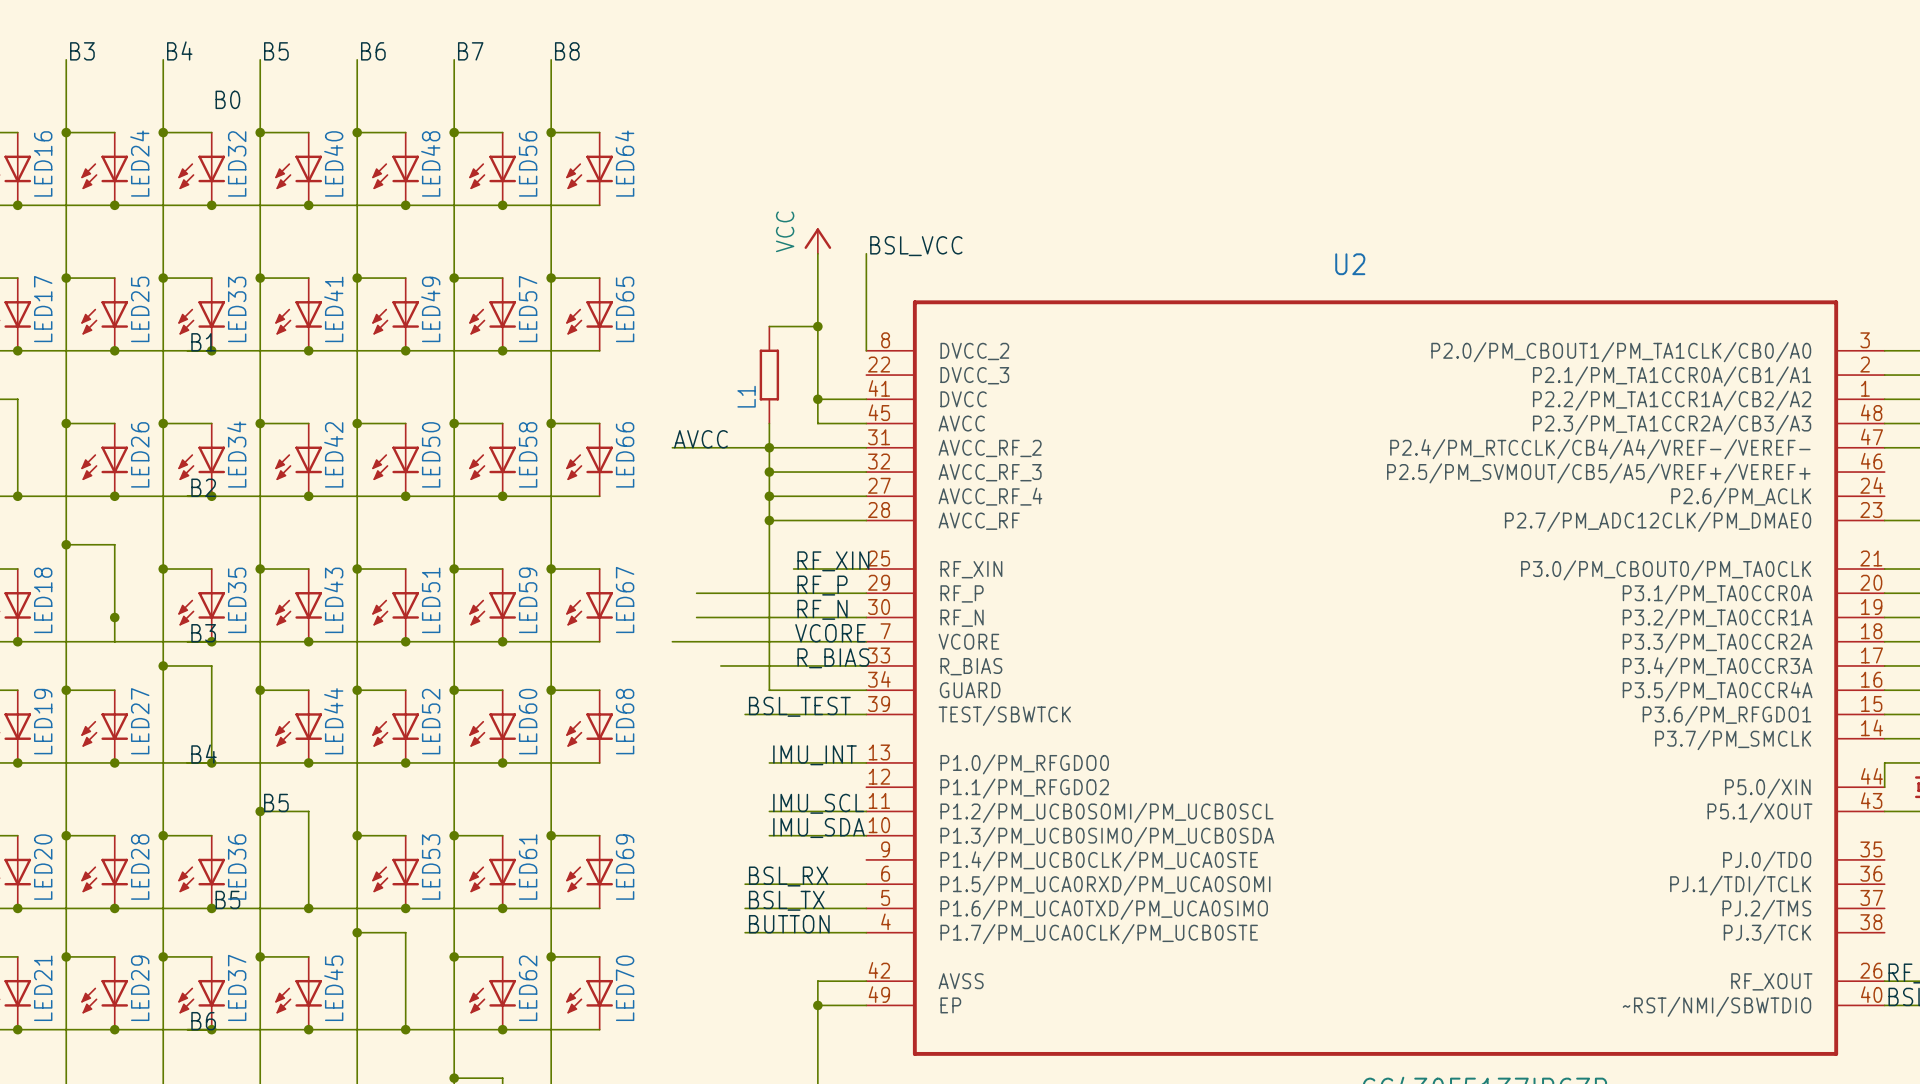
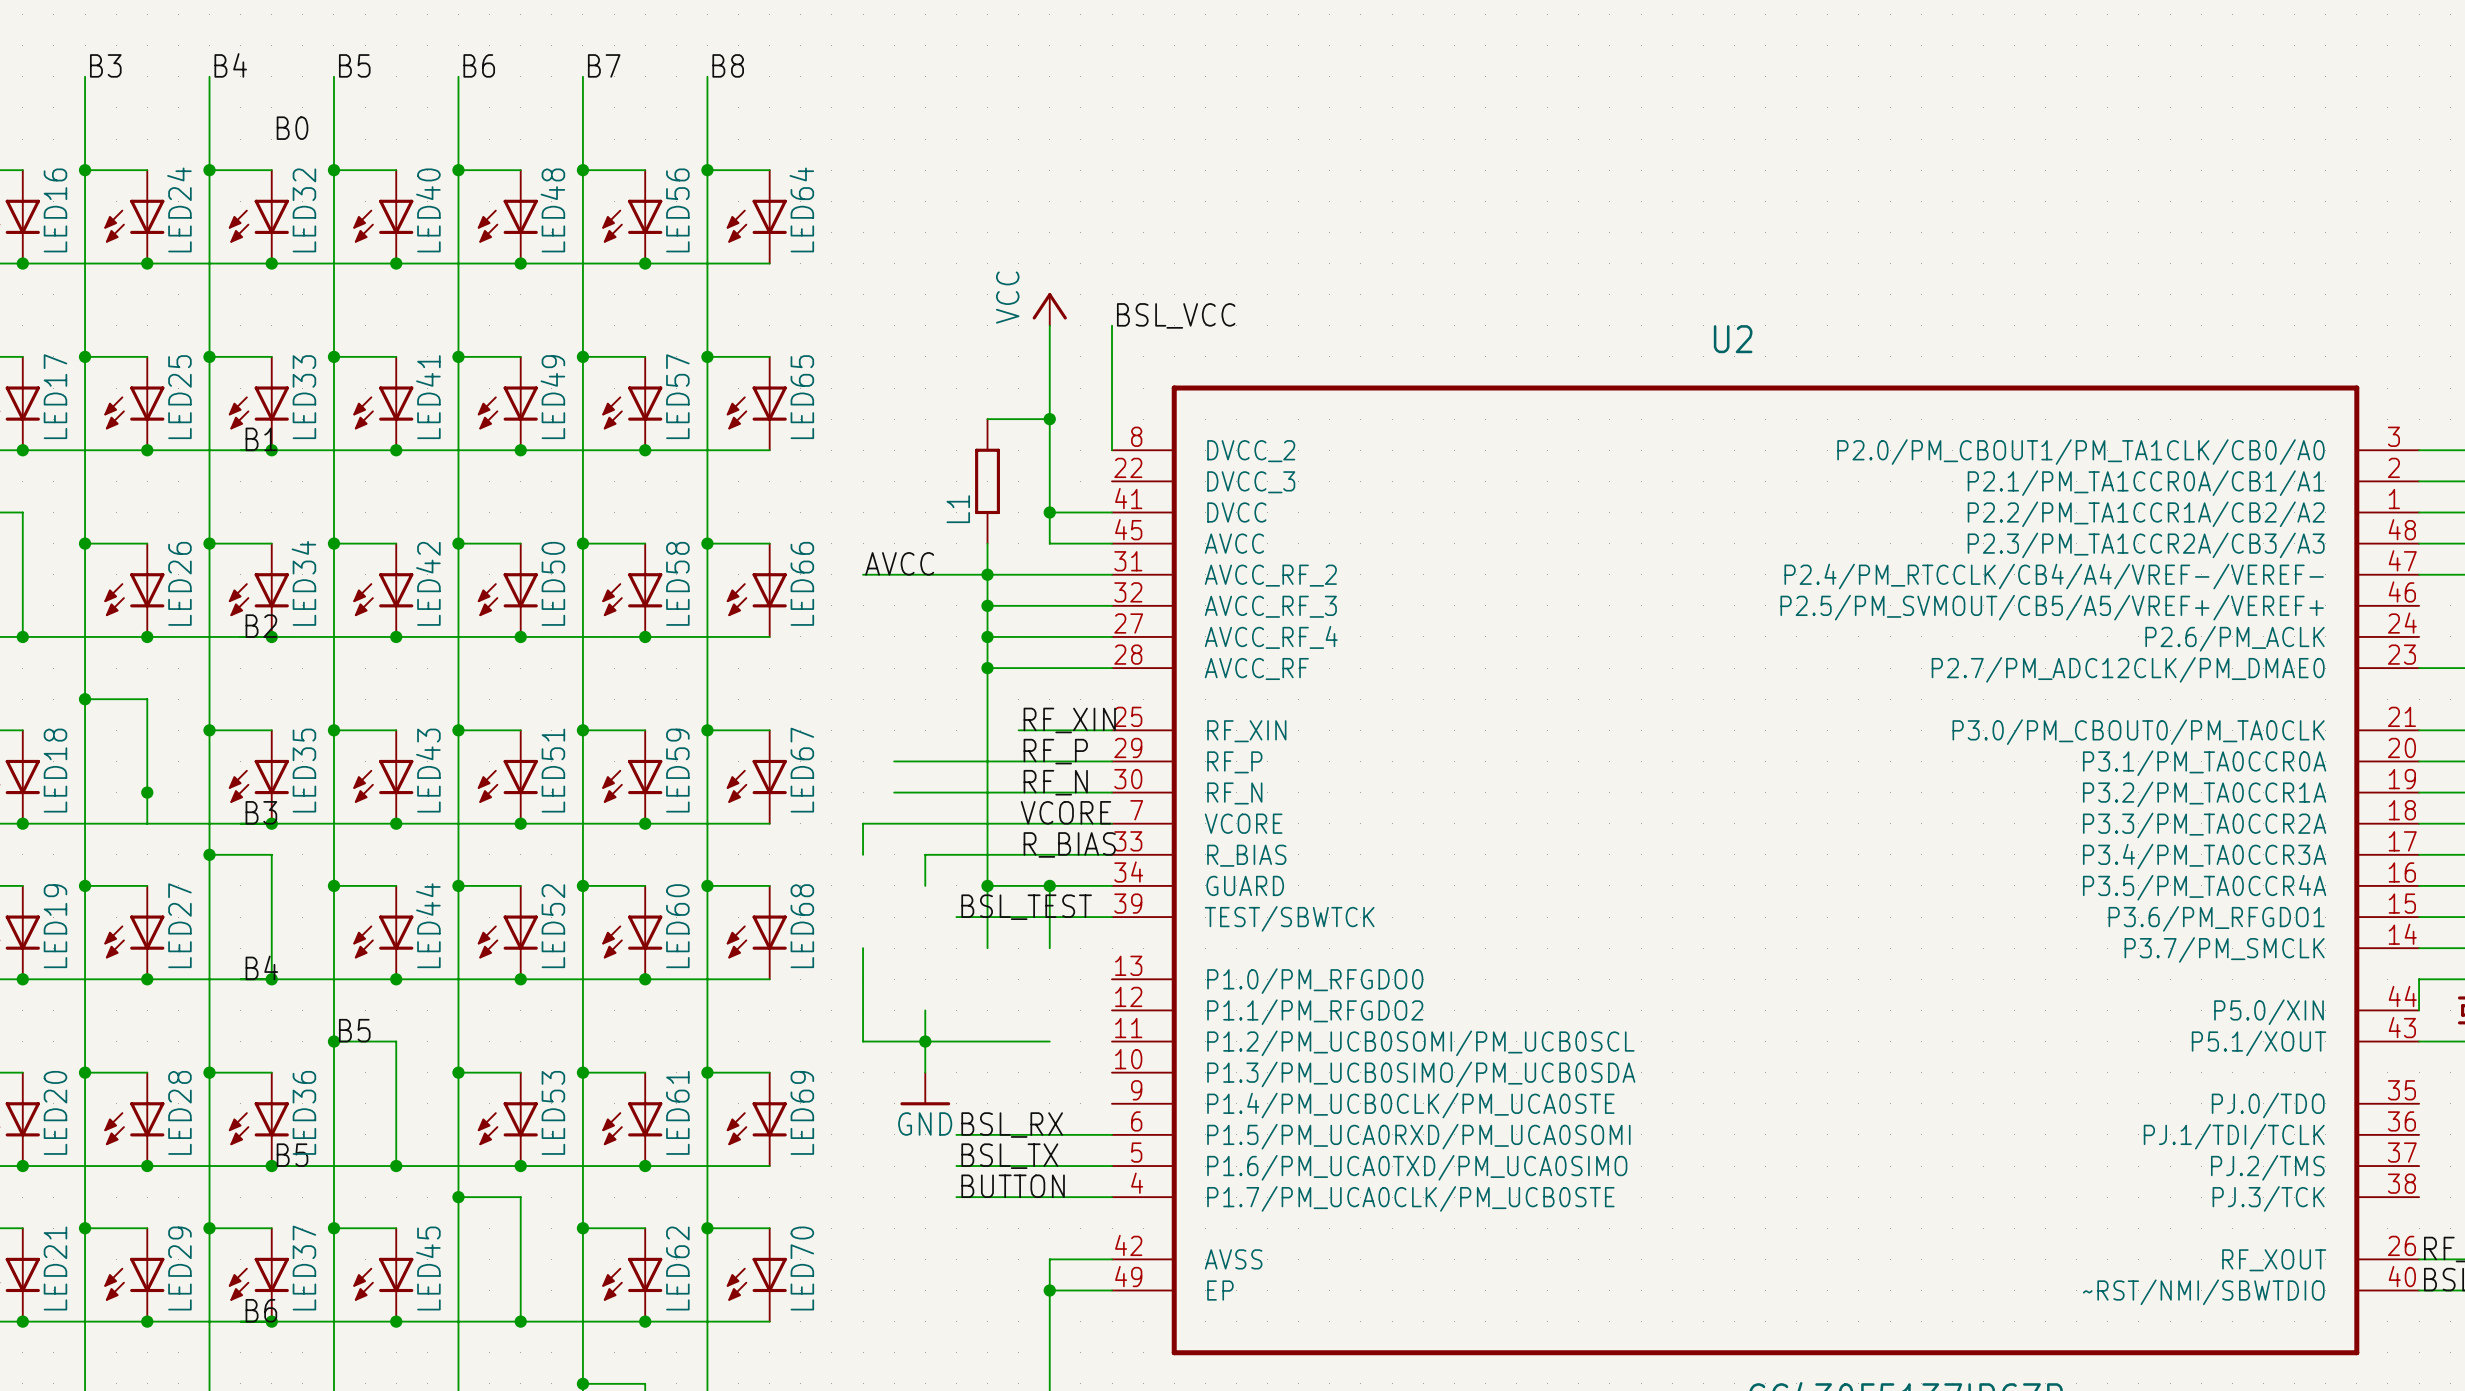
wire: none -> (863, 823) (863, 854)
wire: none -> (925, 854) (925, 885)
wire: none -> (987, 885) (987, 948)
junction: none -> (987, 885)
wire: none -> (1049, 885) (1049, 948)
junction: none -> (1049, 885)
wire: none -> (863, 948) (863, 1041) (987, 1041)
label: IMU_INT (815, 755) -> none
wire: (769, 762) (866, 762) -> none
wire: none -> (925, 1010) (925, 1072)
label: IMU_SCL (818, 803) -> none
junction: none -> (925, 1041)
wire: (817, 811) (866, 811) -> none
label: IMU_SDA (819, 828) -> none
wire: (769, 835) (866, 835) -> none
power symbol: none -> GND (925, 1088)

